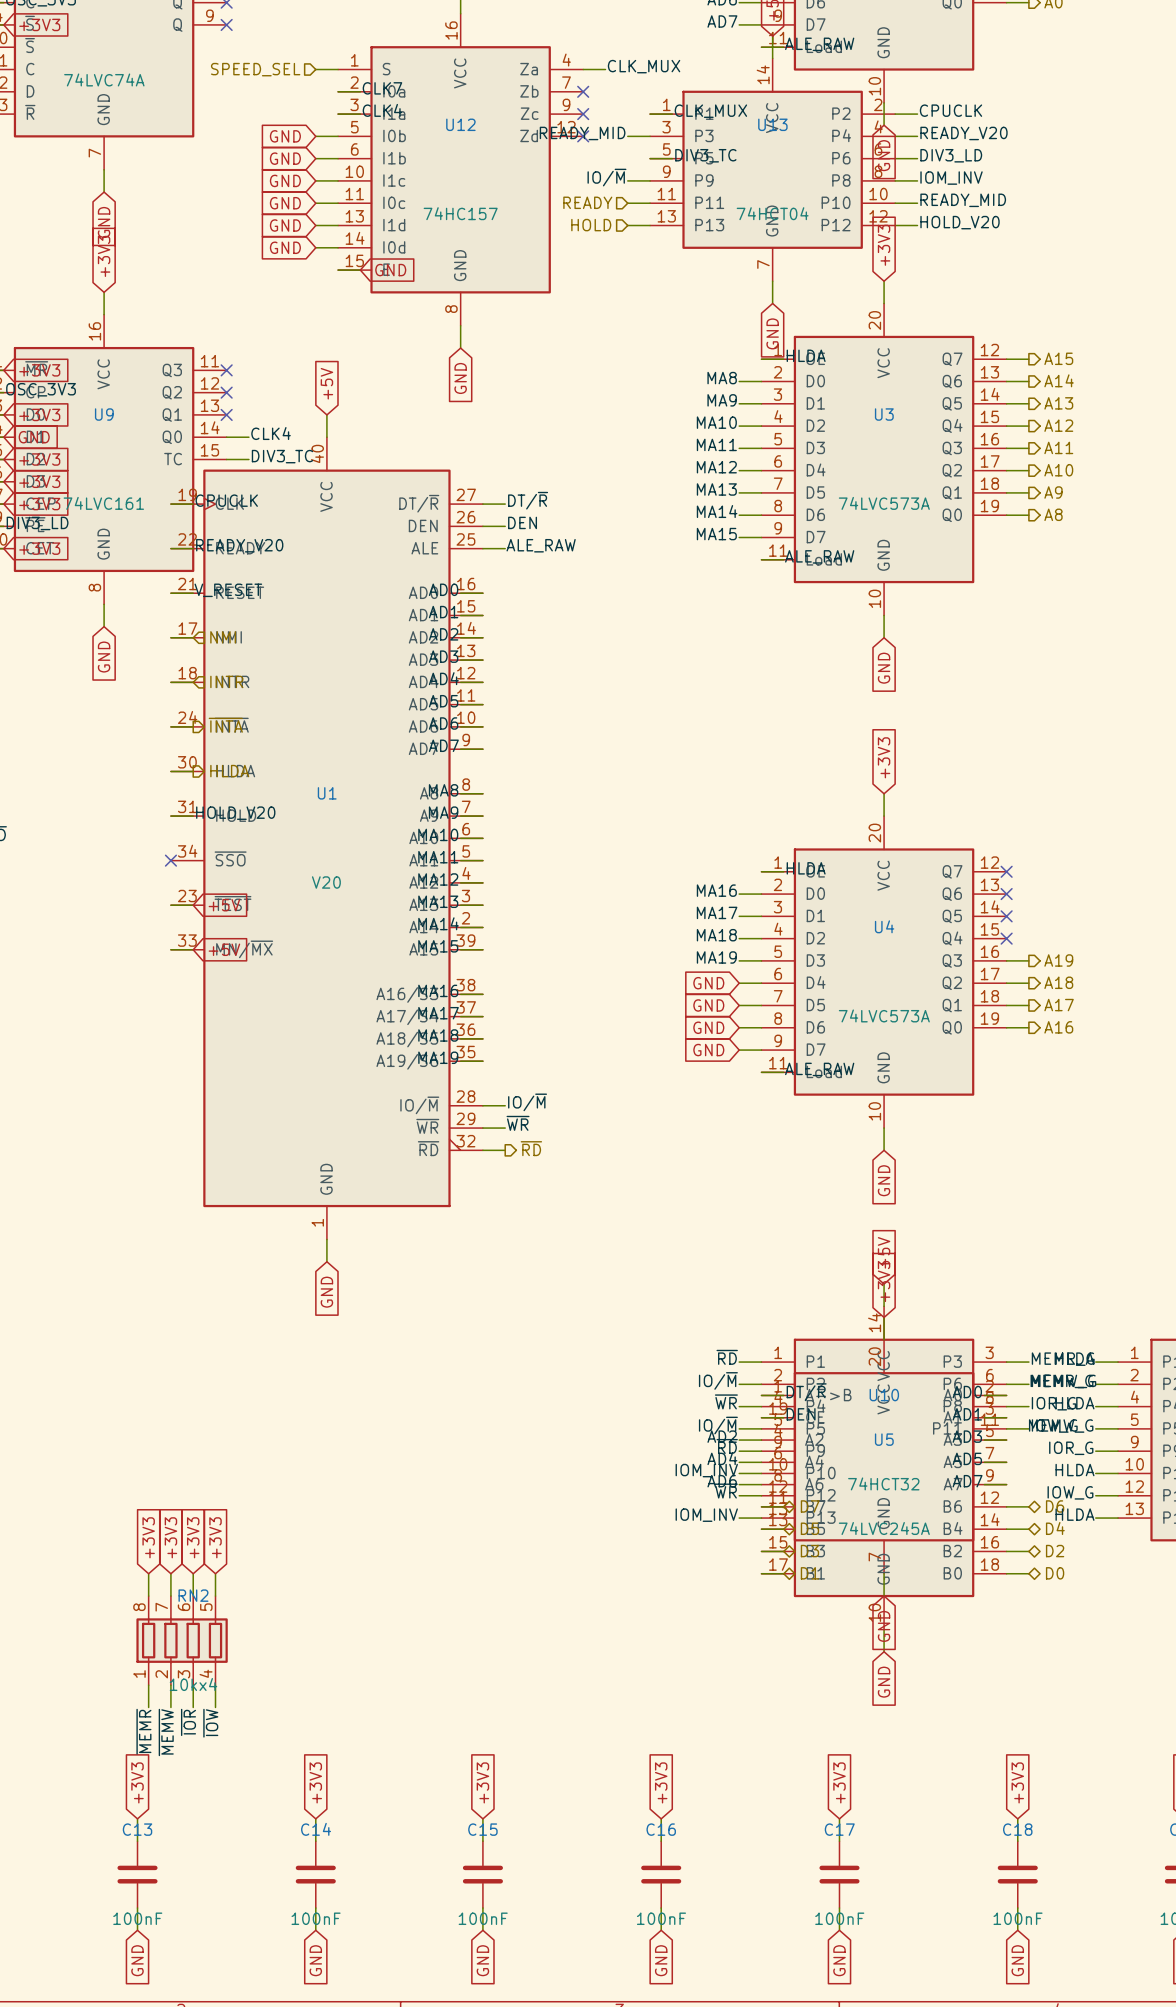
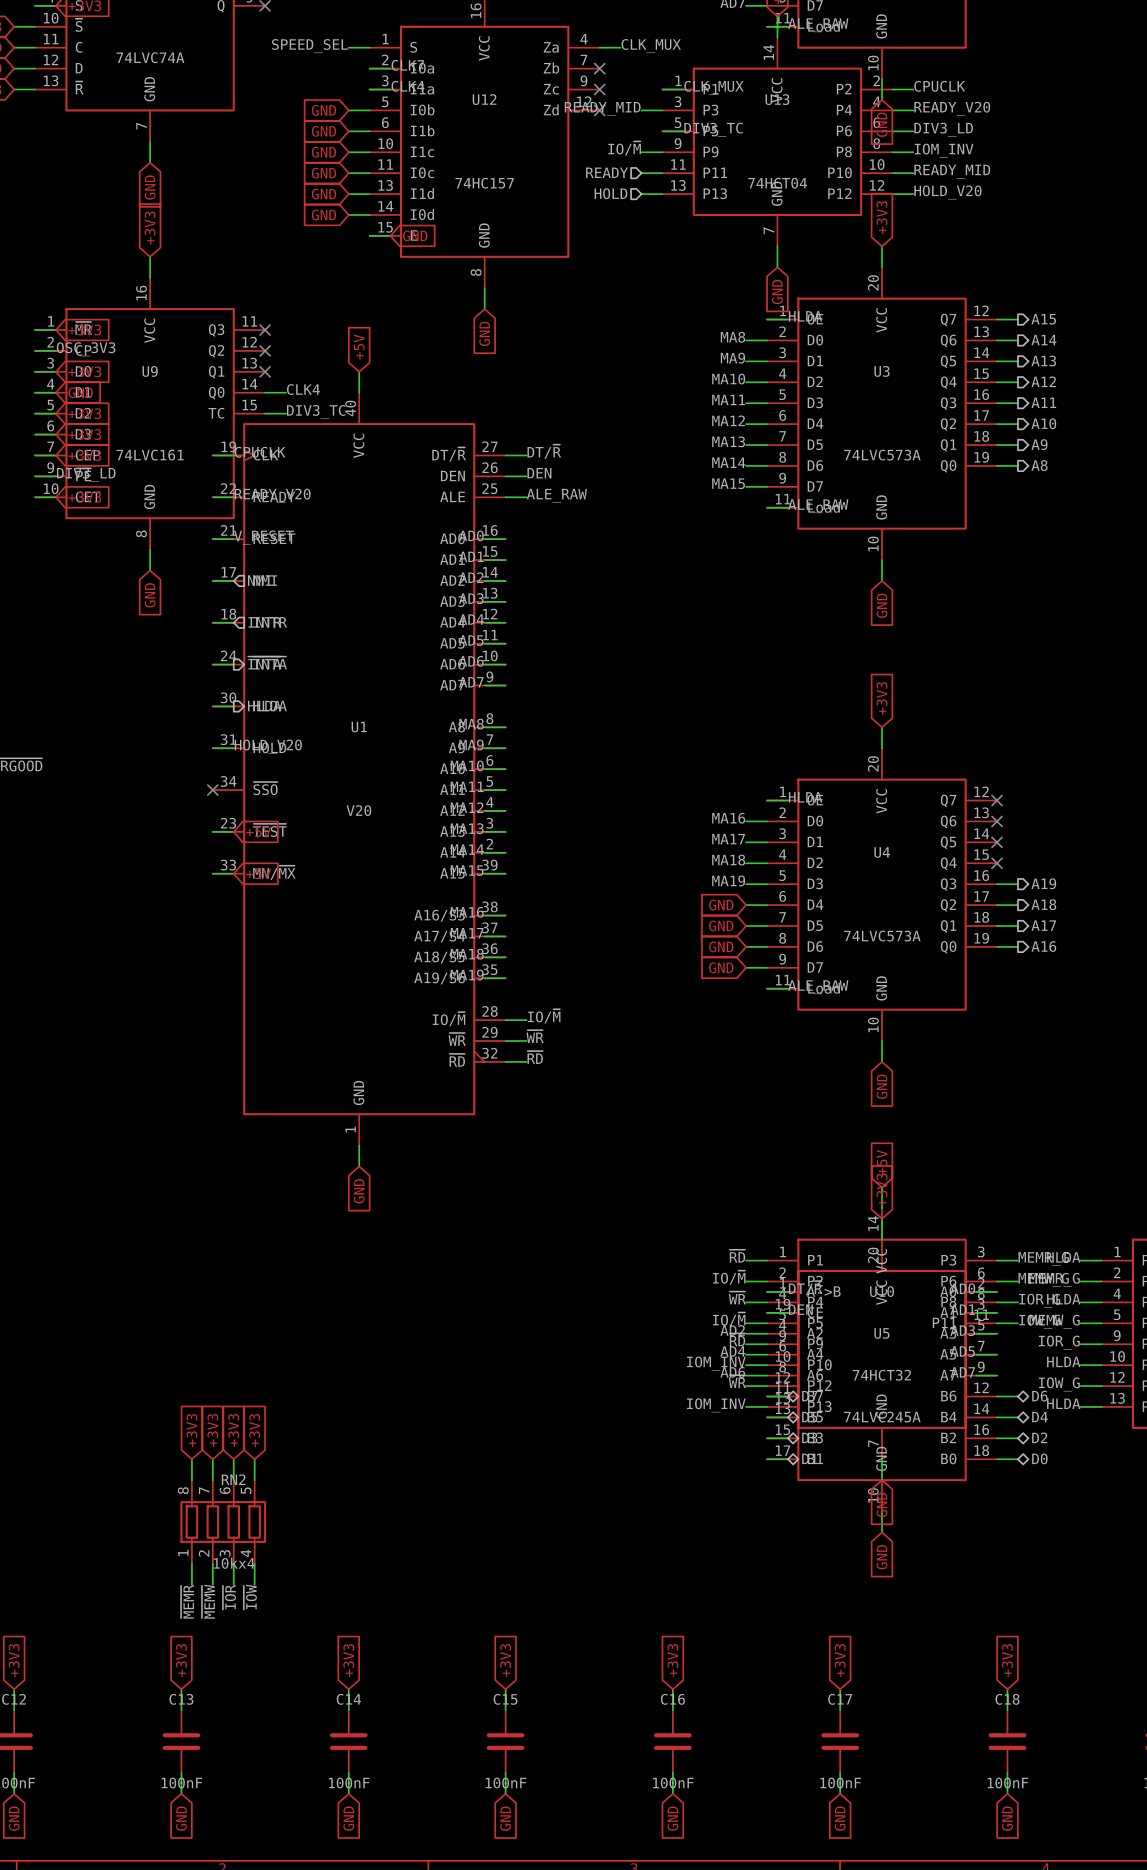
label: none -> SPEED_SEL (310, 46)
hierarchical label: SPEED_SEL (255, 69) -> none
label: none -> ~{RD} (535, 1057)
hierarchical label: ~{RD} (531, 1148) -> none

